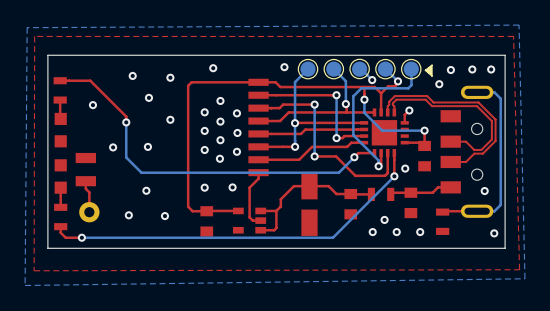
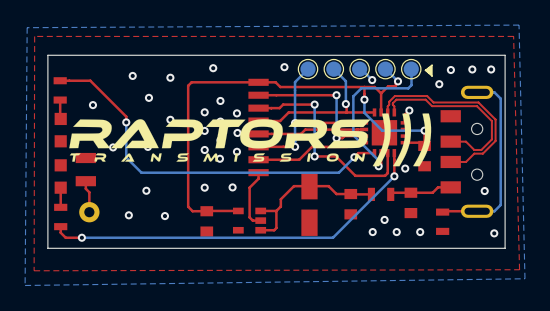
drawing: none -> [69, 113, 432, 167]

